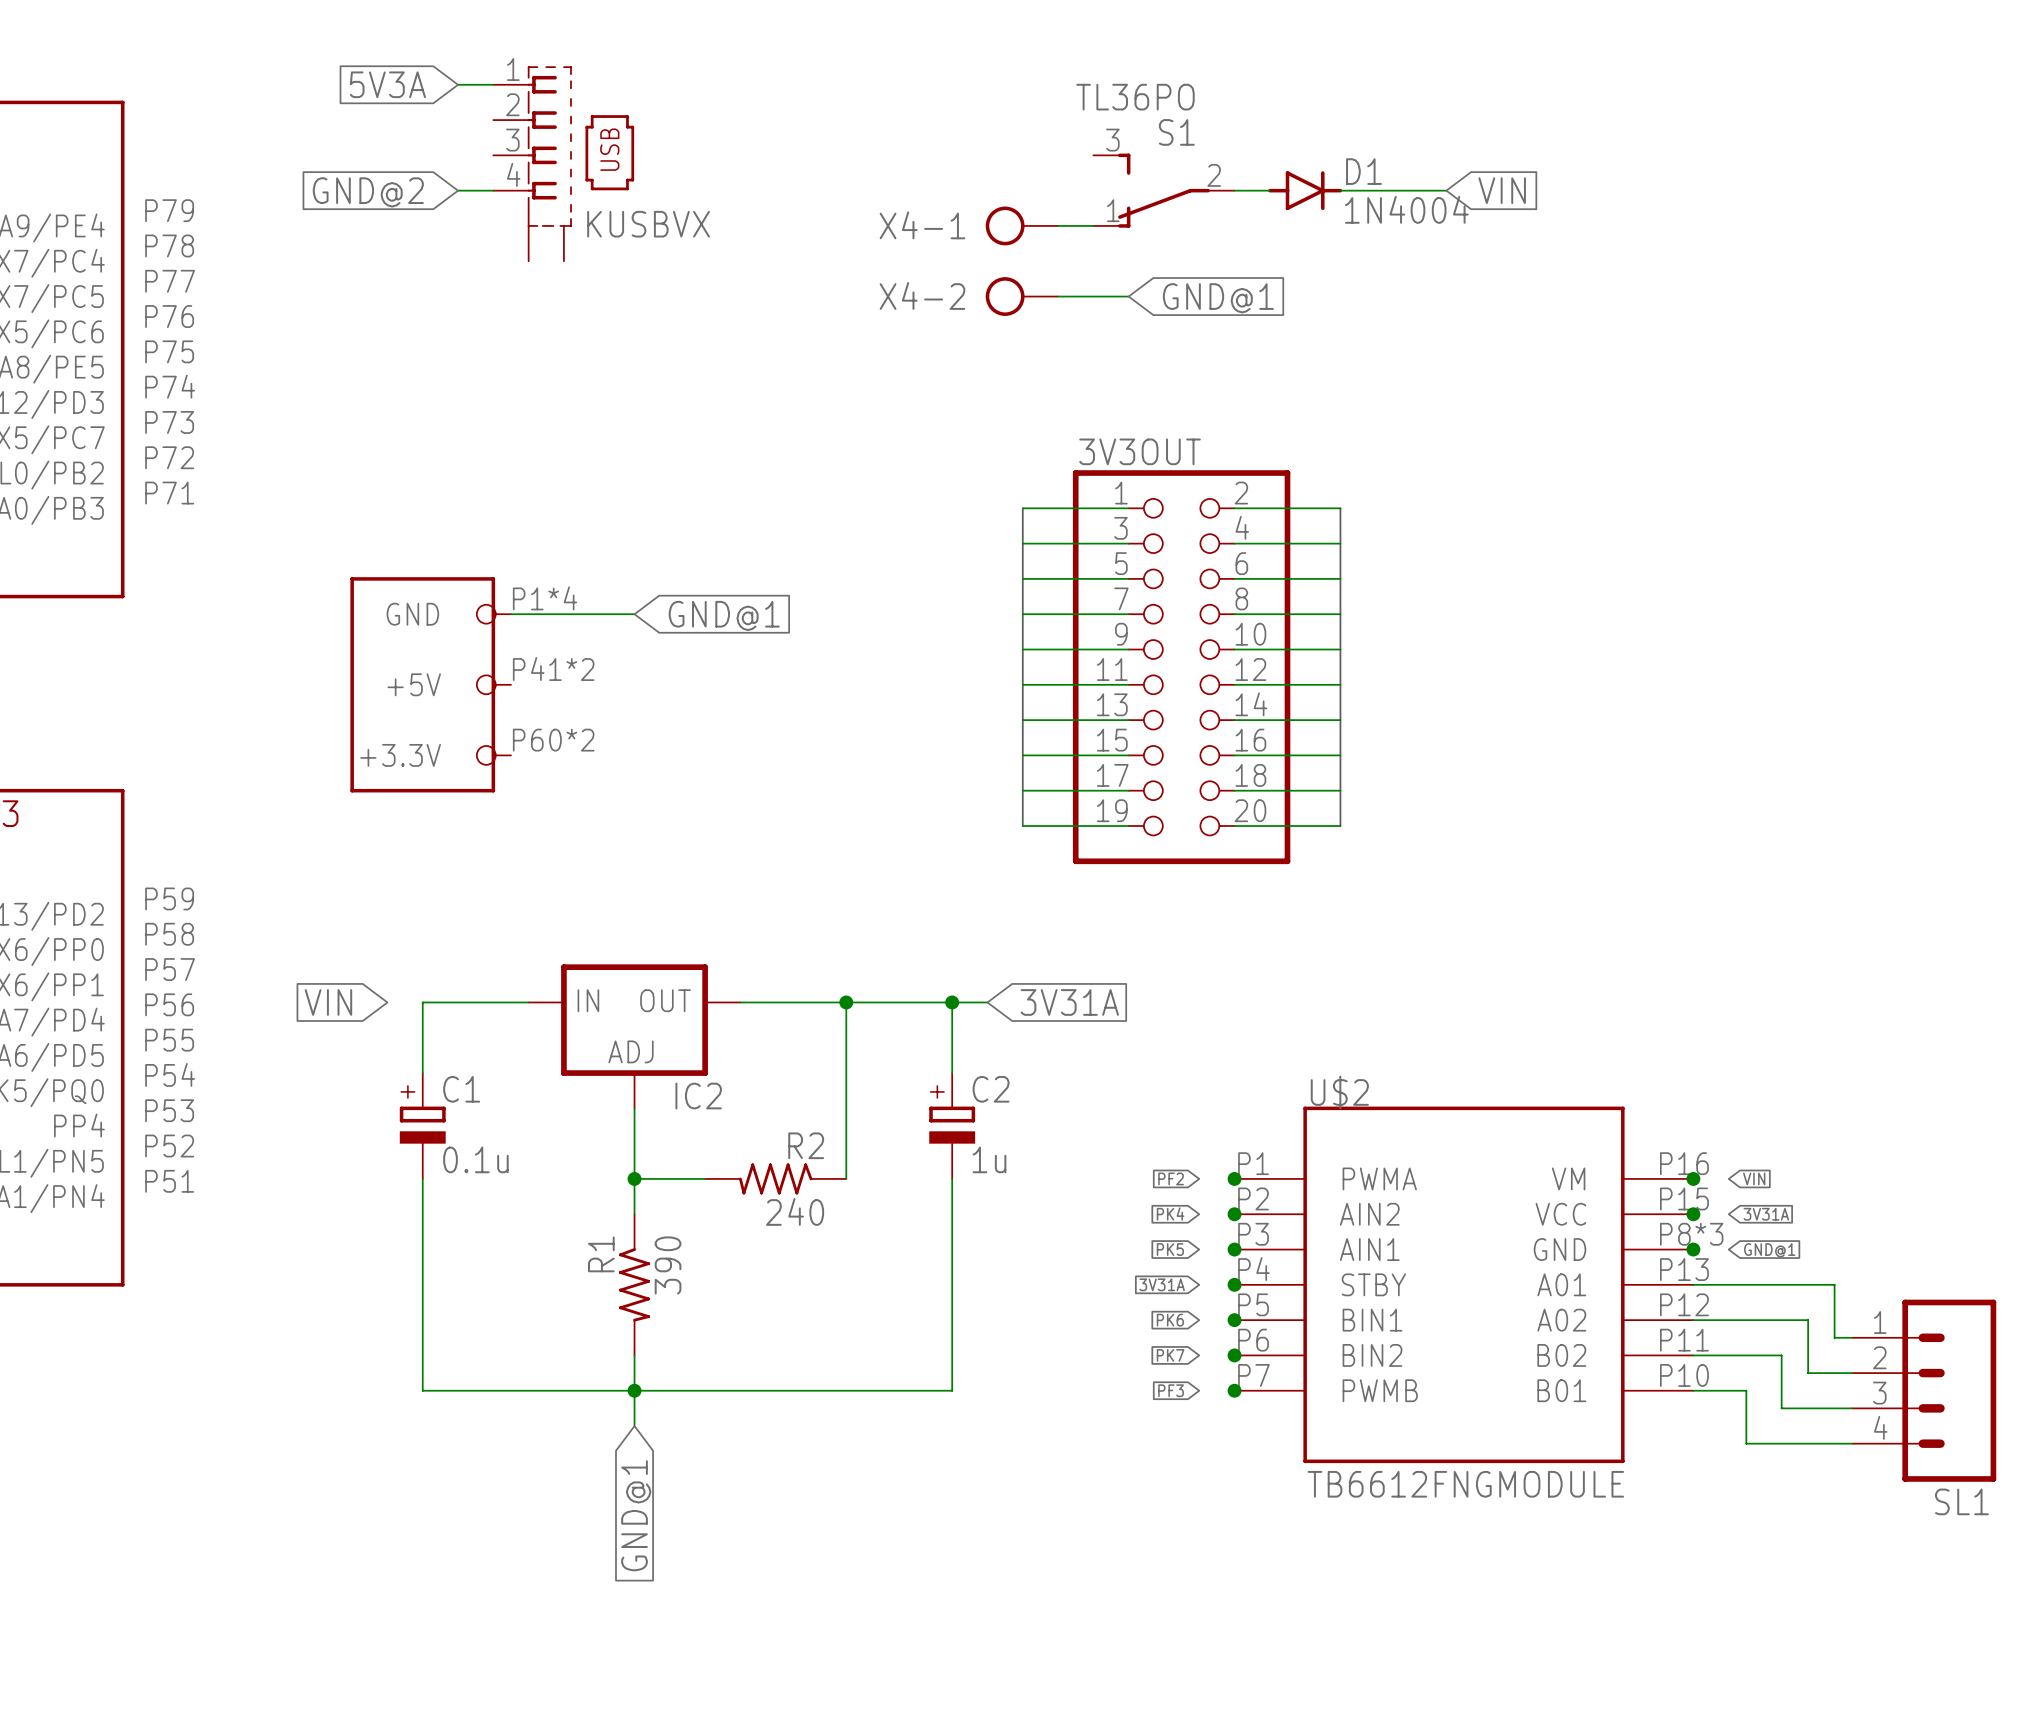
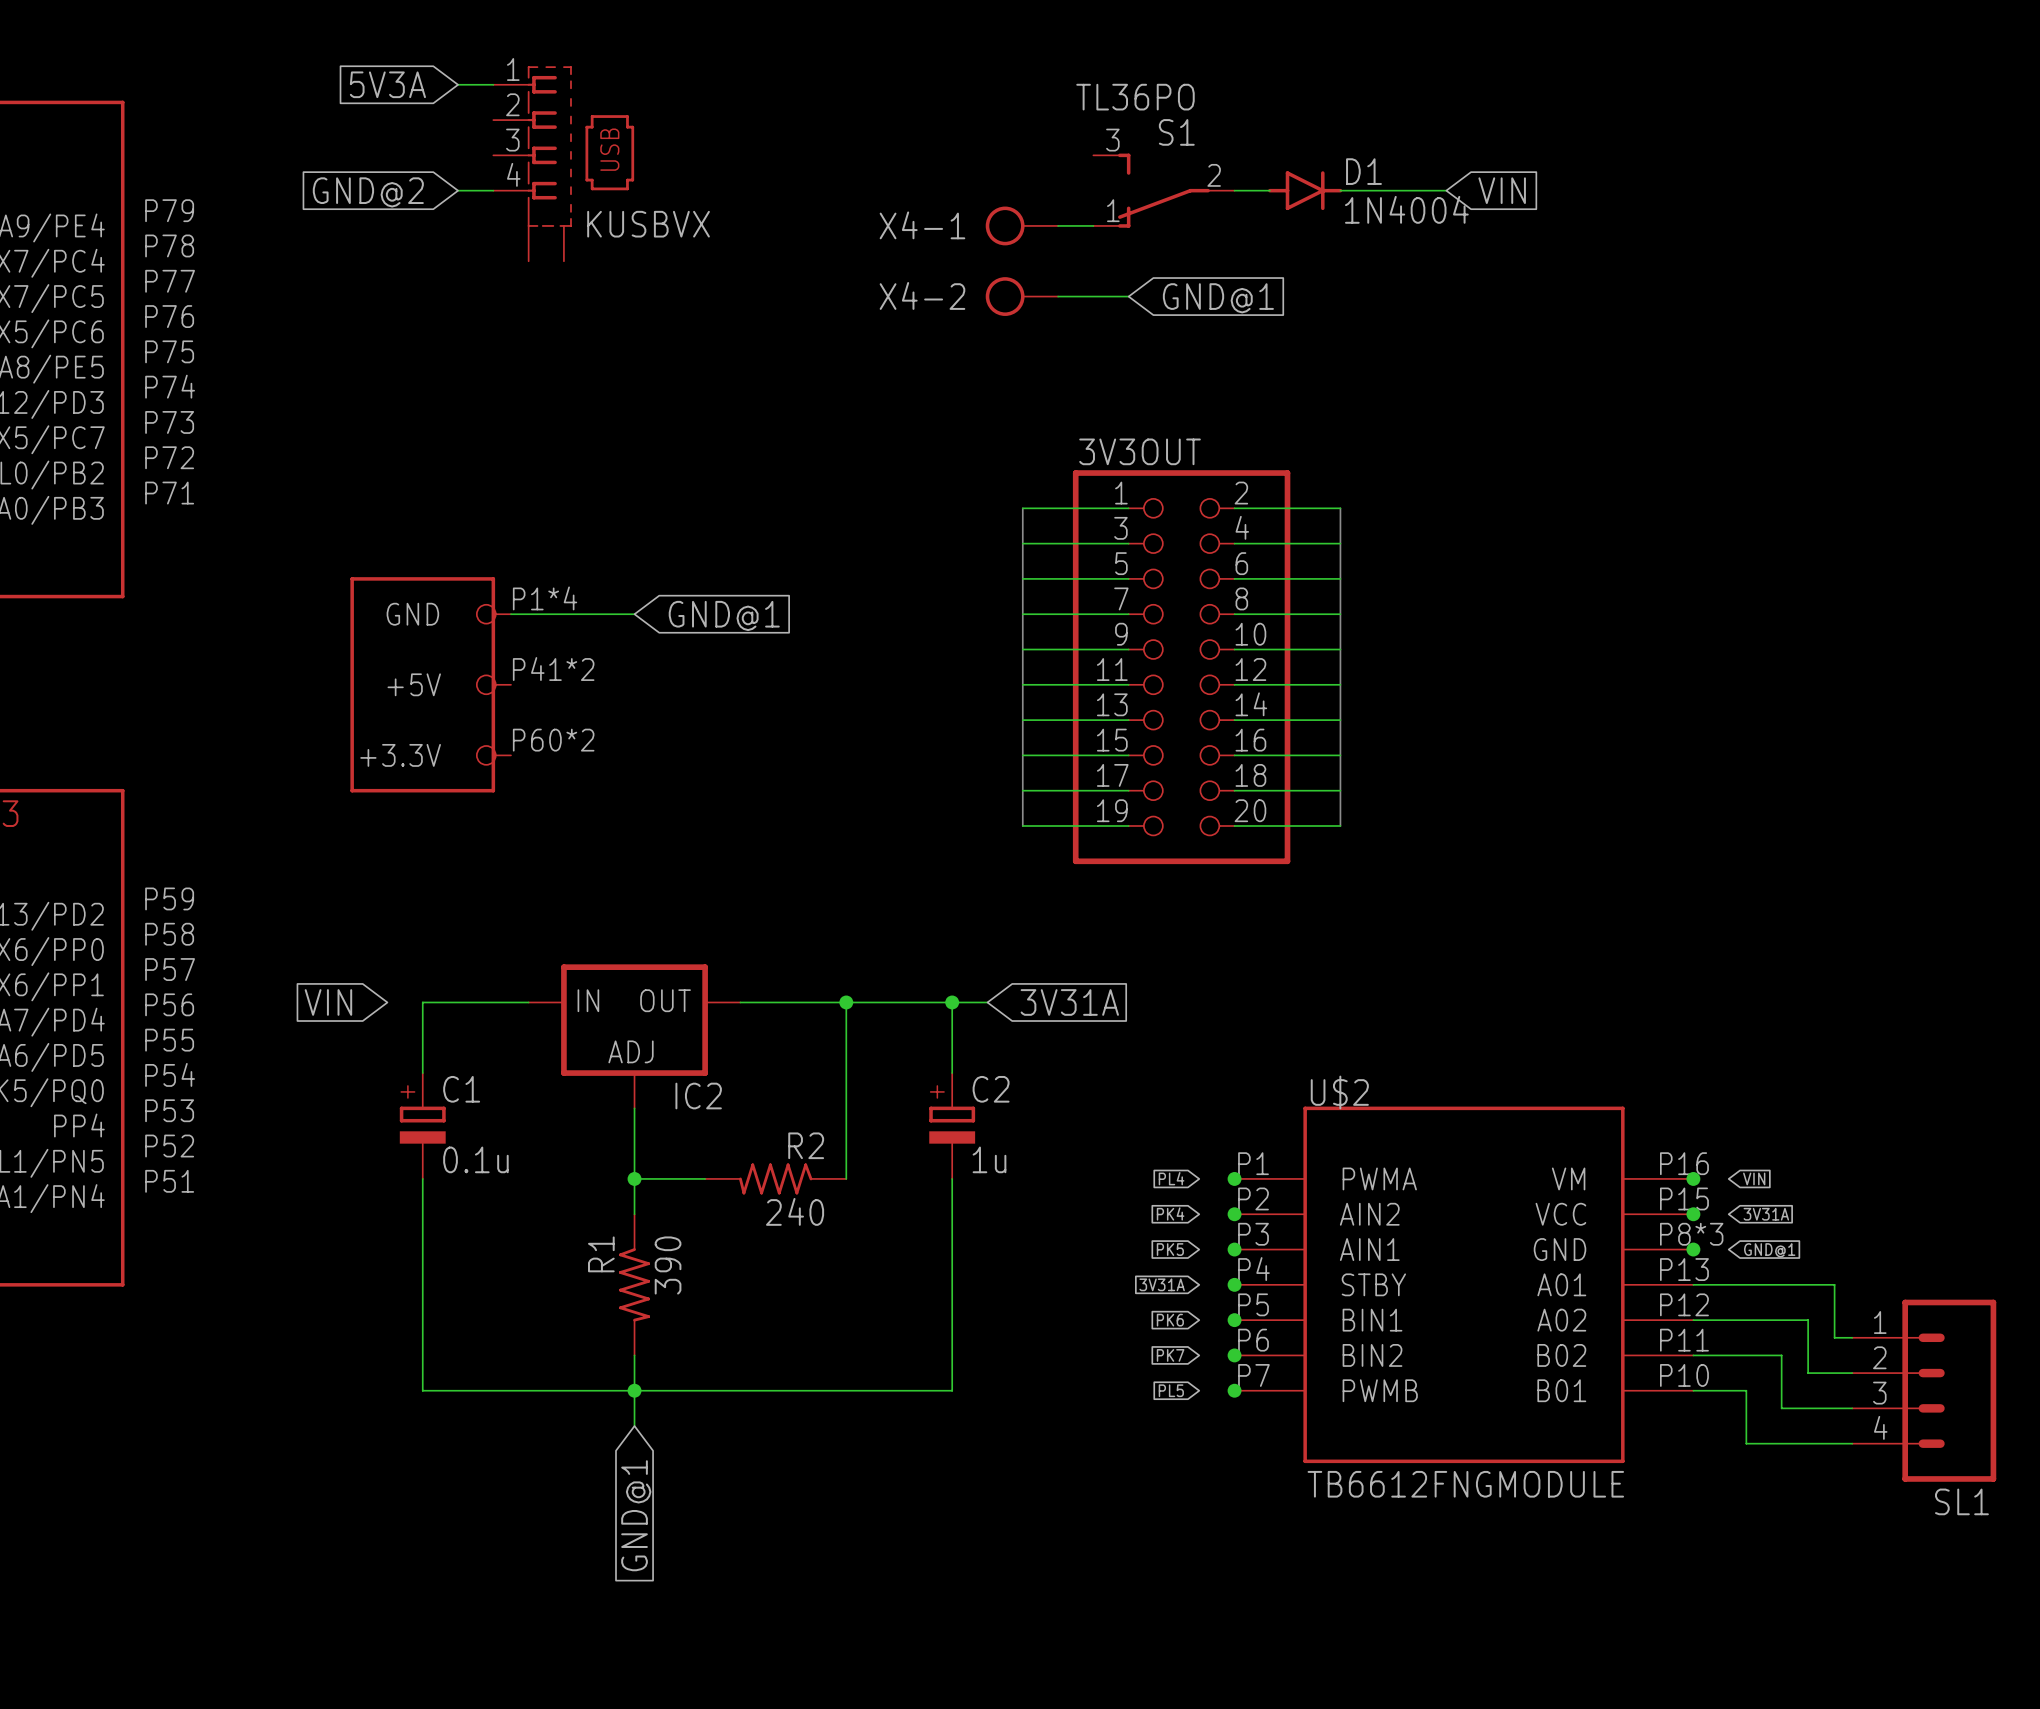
global label: PF2 (1171, 1178) -> PL4 (1171, 1178)
global label: PF3 (1171, 1390) -> PL5 (1171, 1390)

